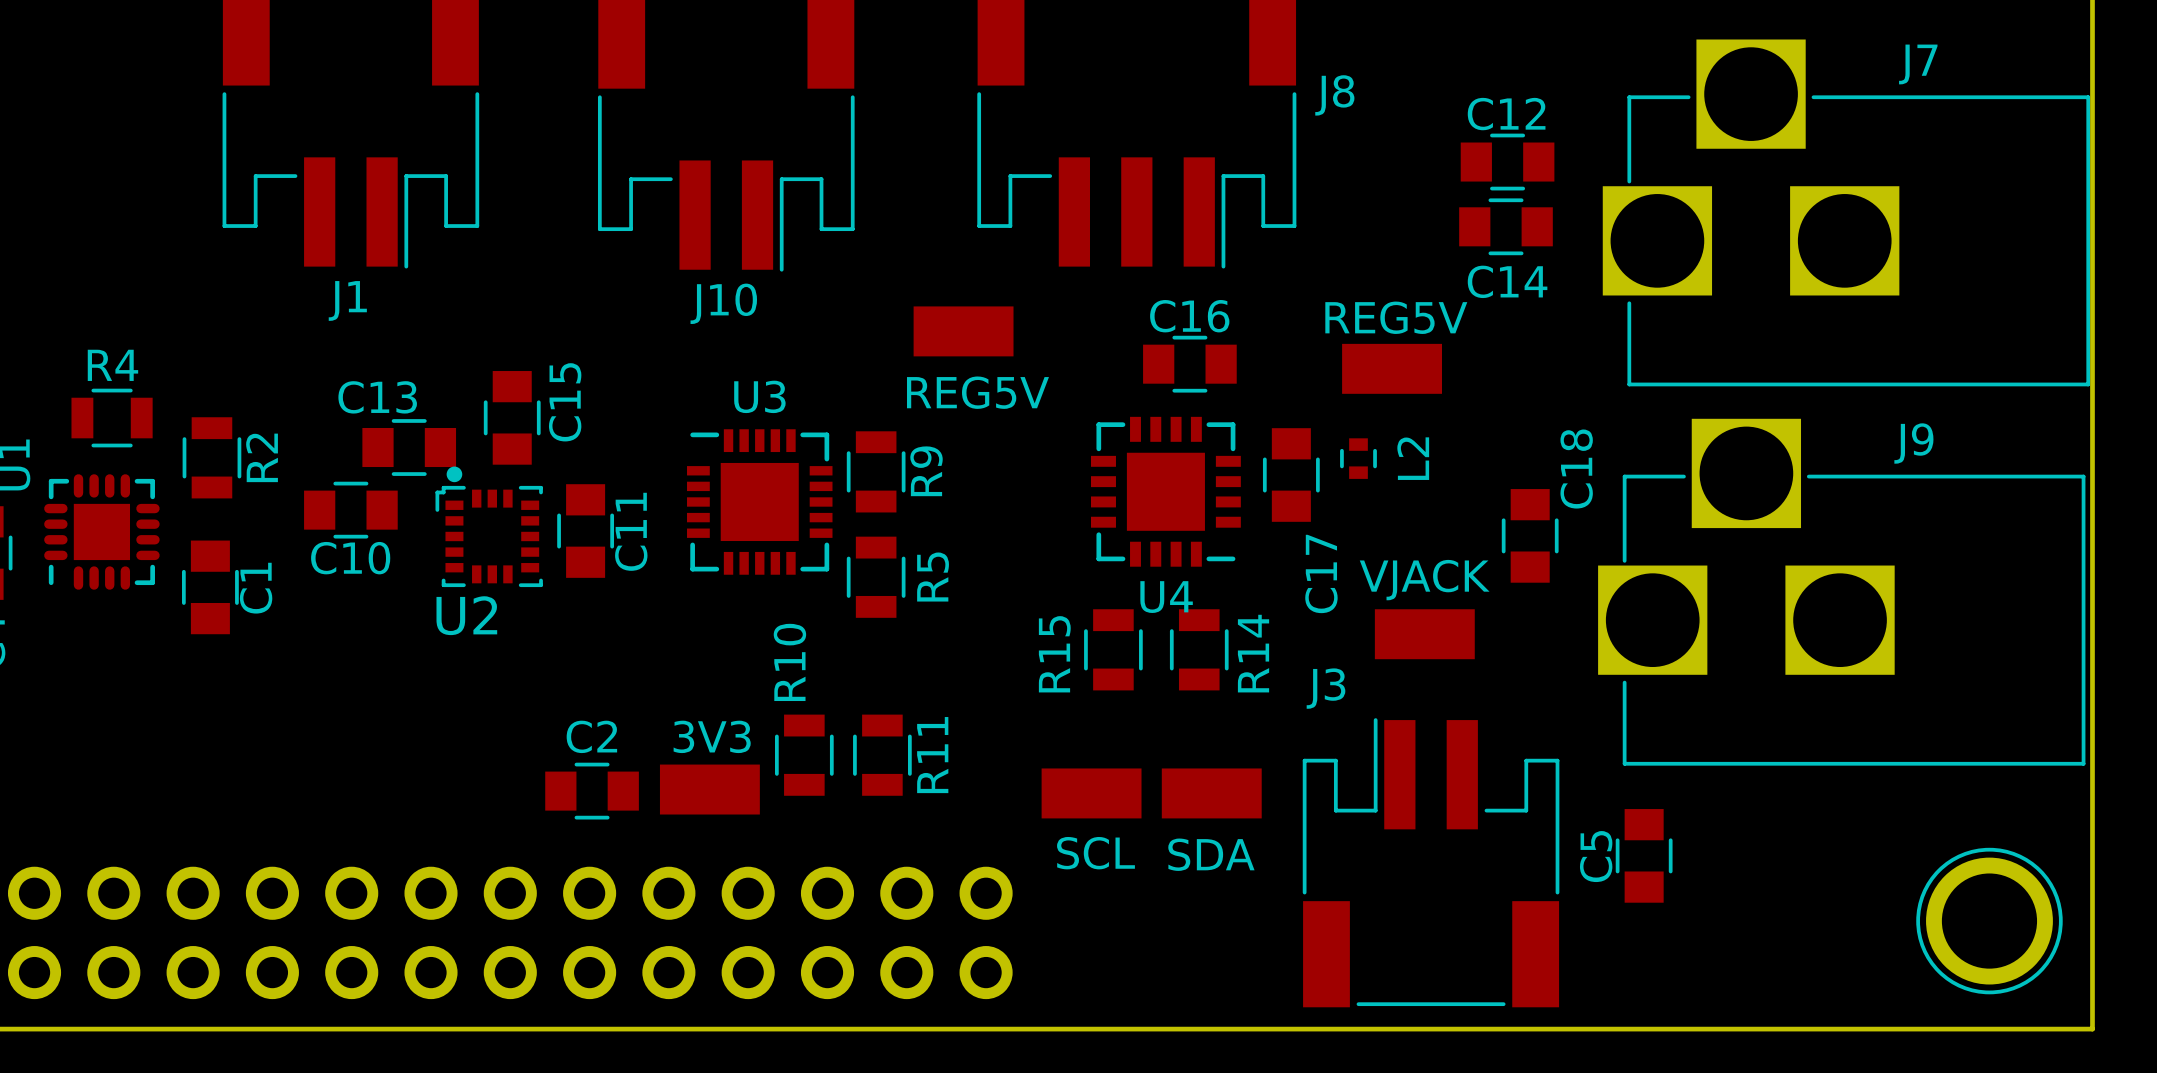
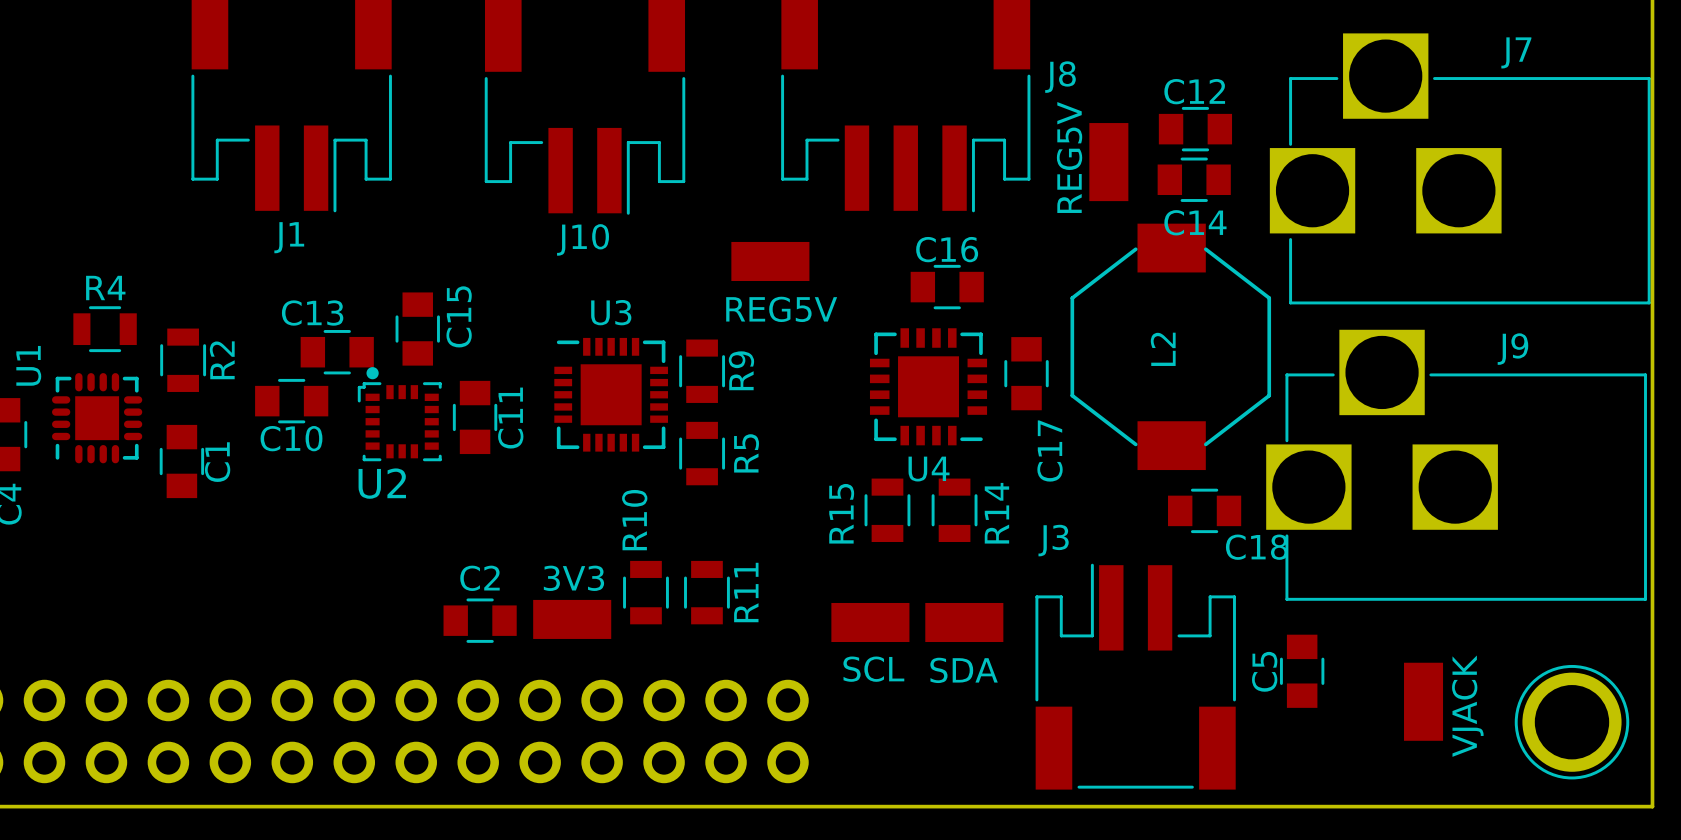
text rotation: 0° (1396, 317) -> 90° counterclockwise (1069, 157)
part rotation: 0° (1392, 368) -> 90° clockwise (1108, 162)
part position: (1392, 368) -> (1108, 162)
L2 footprint: [1340, 438, 1377, 479] -> [1070, 223, 1272, 471]
L2 name position: L2 (1413, 458) -> L2 (1163, 349)
C18 rotation: 0° (1530, 535) -> 90° clockwise (1204, 510)
C18 position: (1530, 535) -> (1204, 510)
text rotation: 0° (1424, 580) -> 90° counterclockwise (1467, 706)
text position: VJACK (1424, 580) -> VJACK (1467, 706)
part: (1424, 634) -> none
part: none -> (1423, 701)

